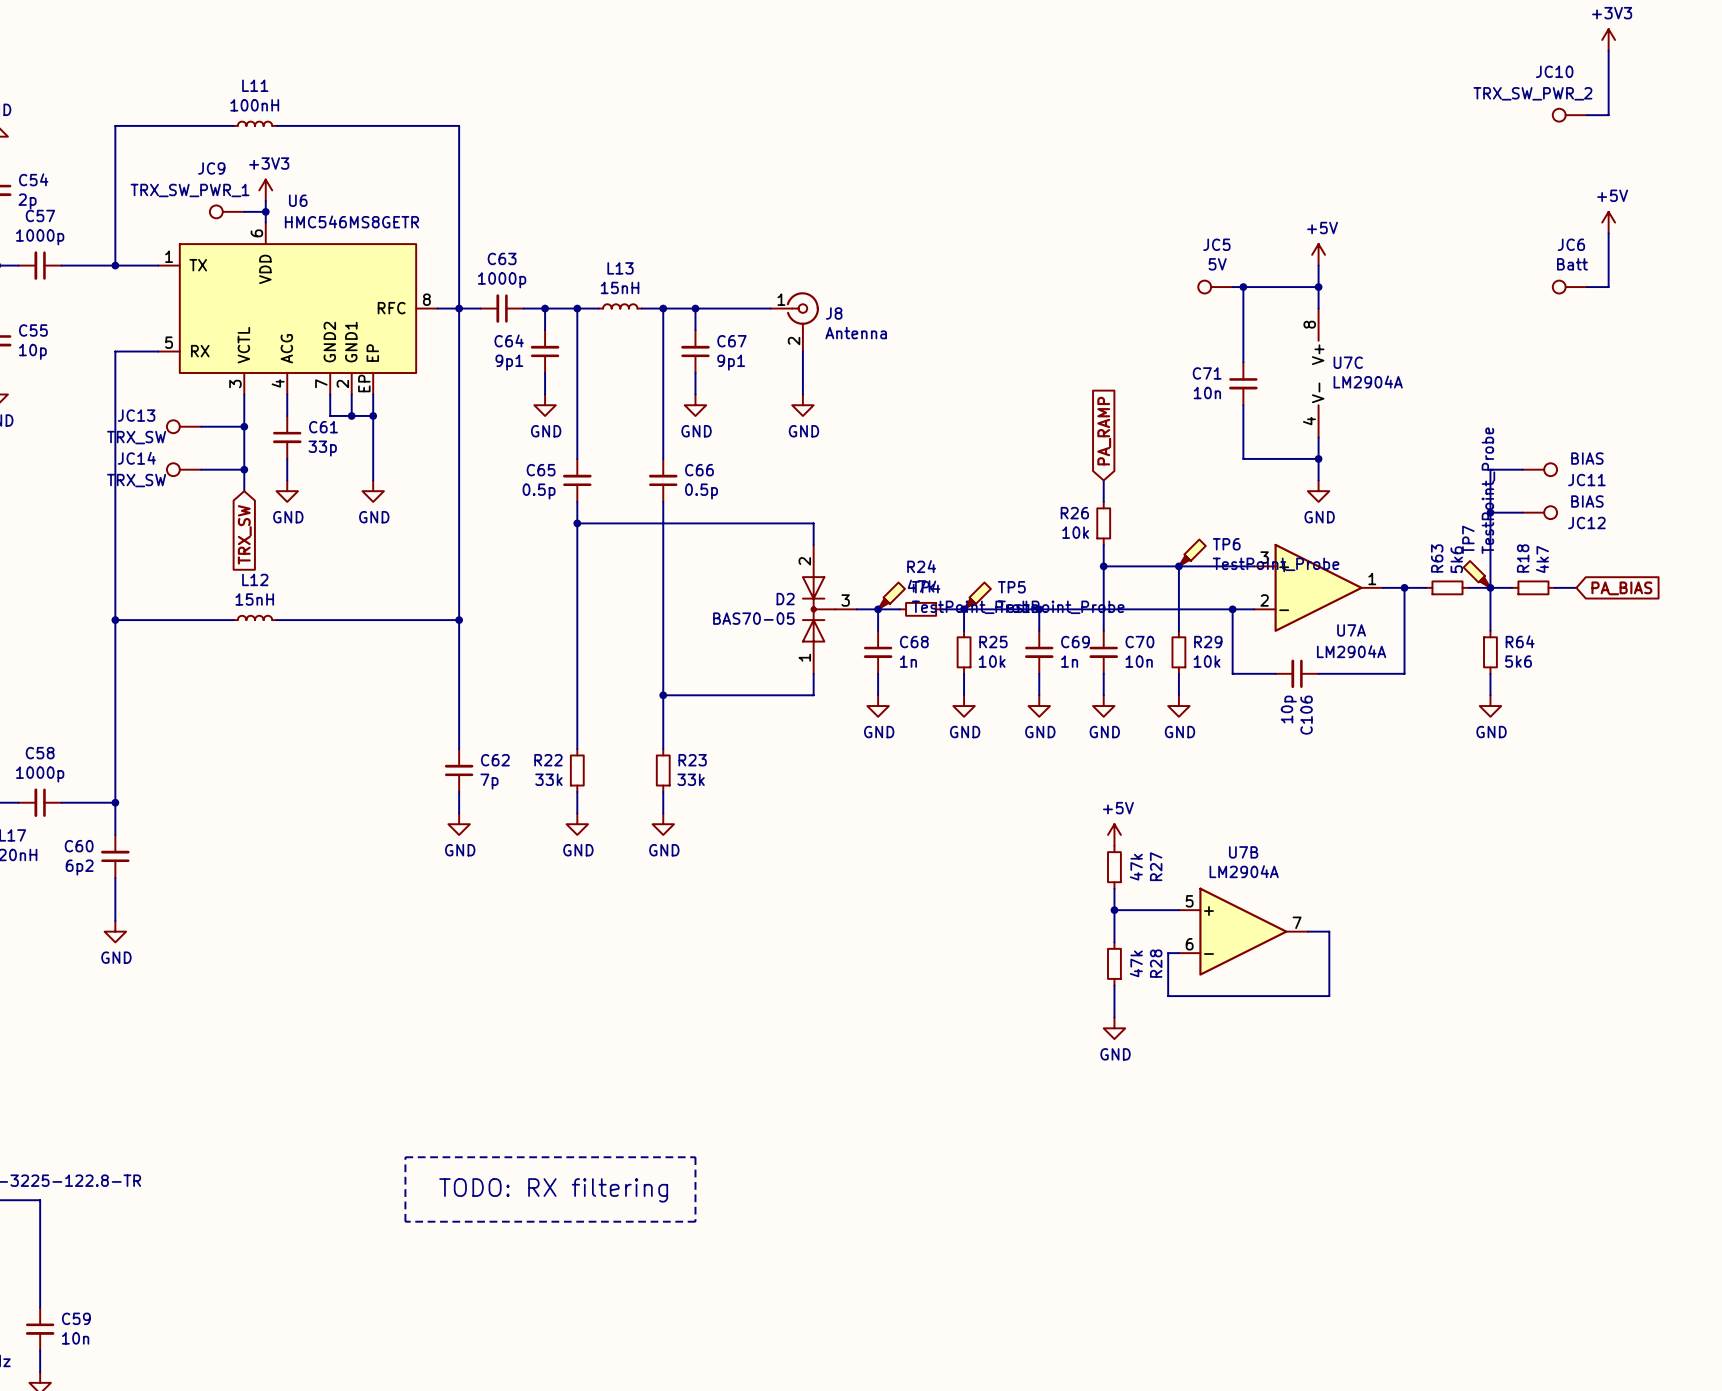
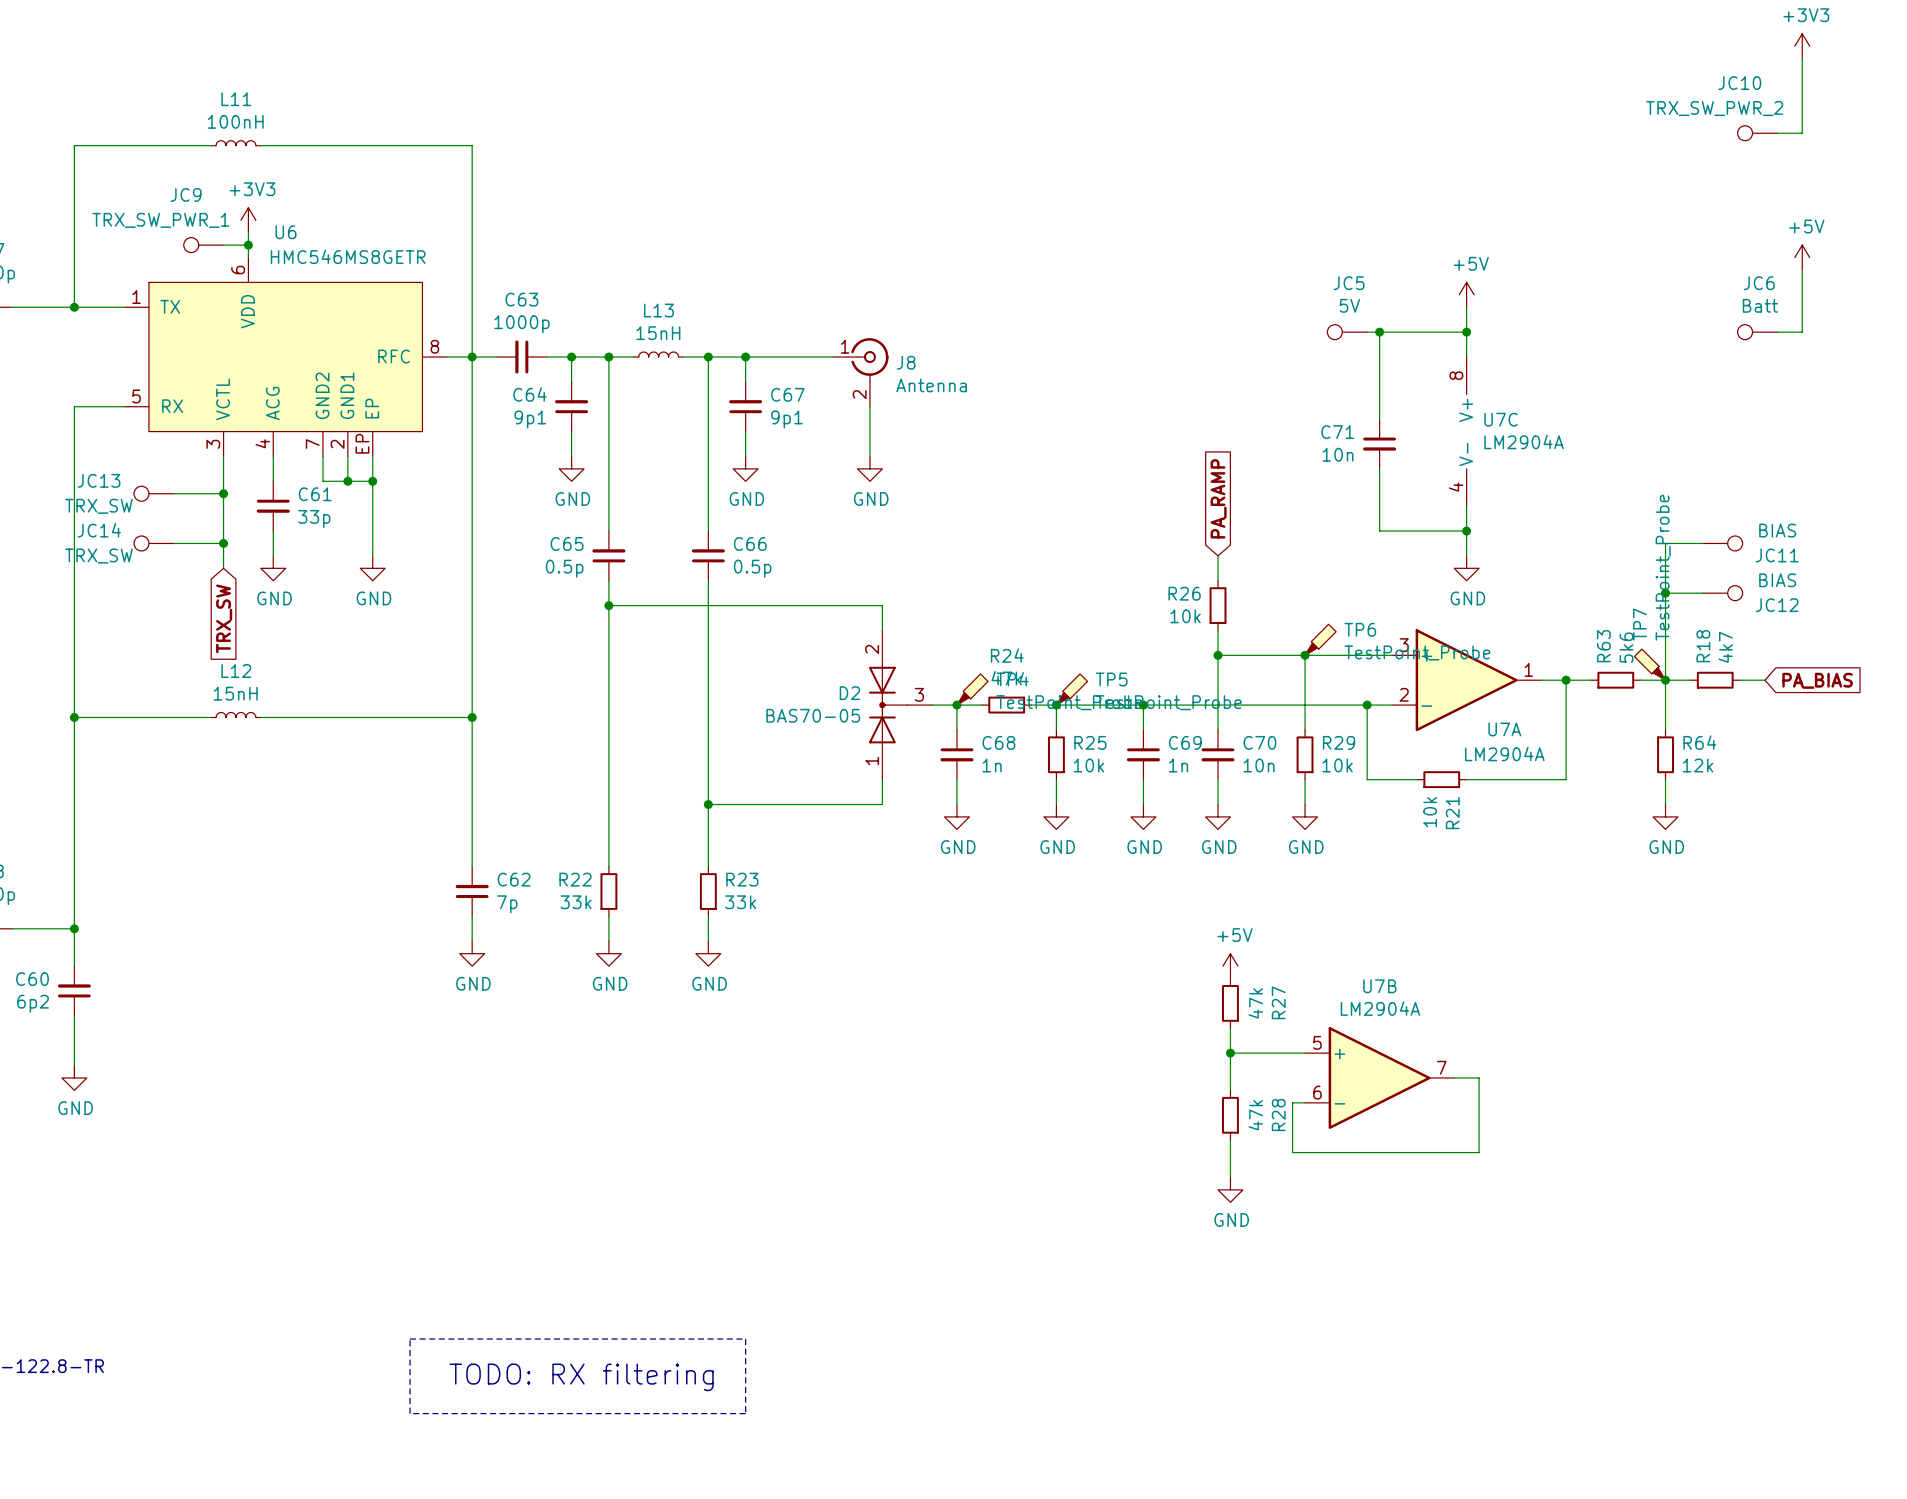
R64 value: 5k6 (1518, 661) -> 12k (1698, 765)
C106: 10p (1297, 673) -> none
R21: none -> 10k (1441, 779)

